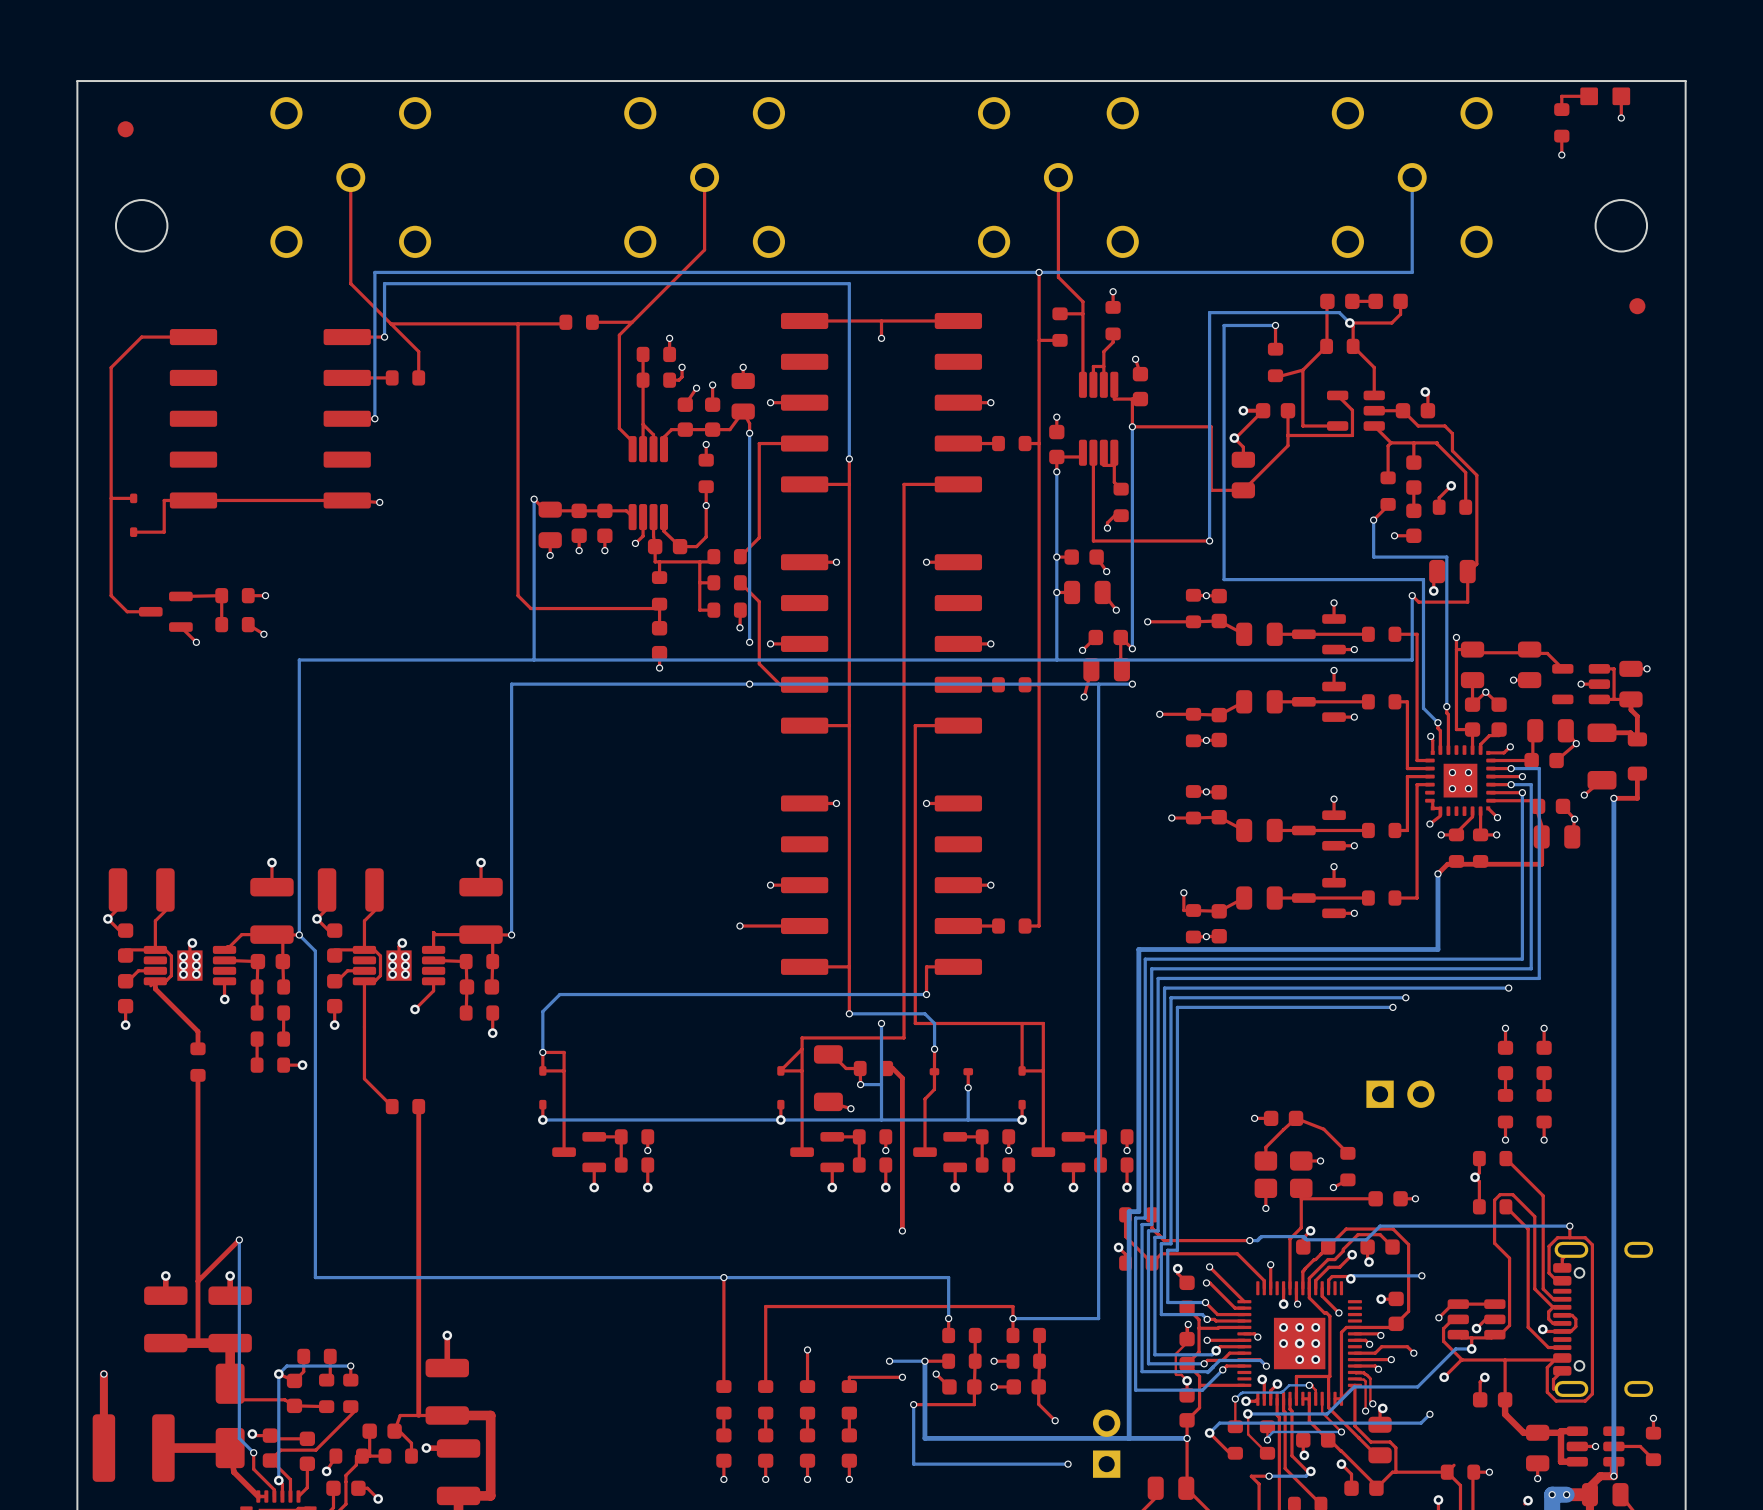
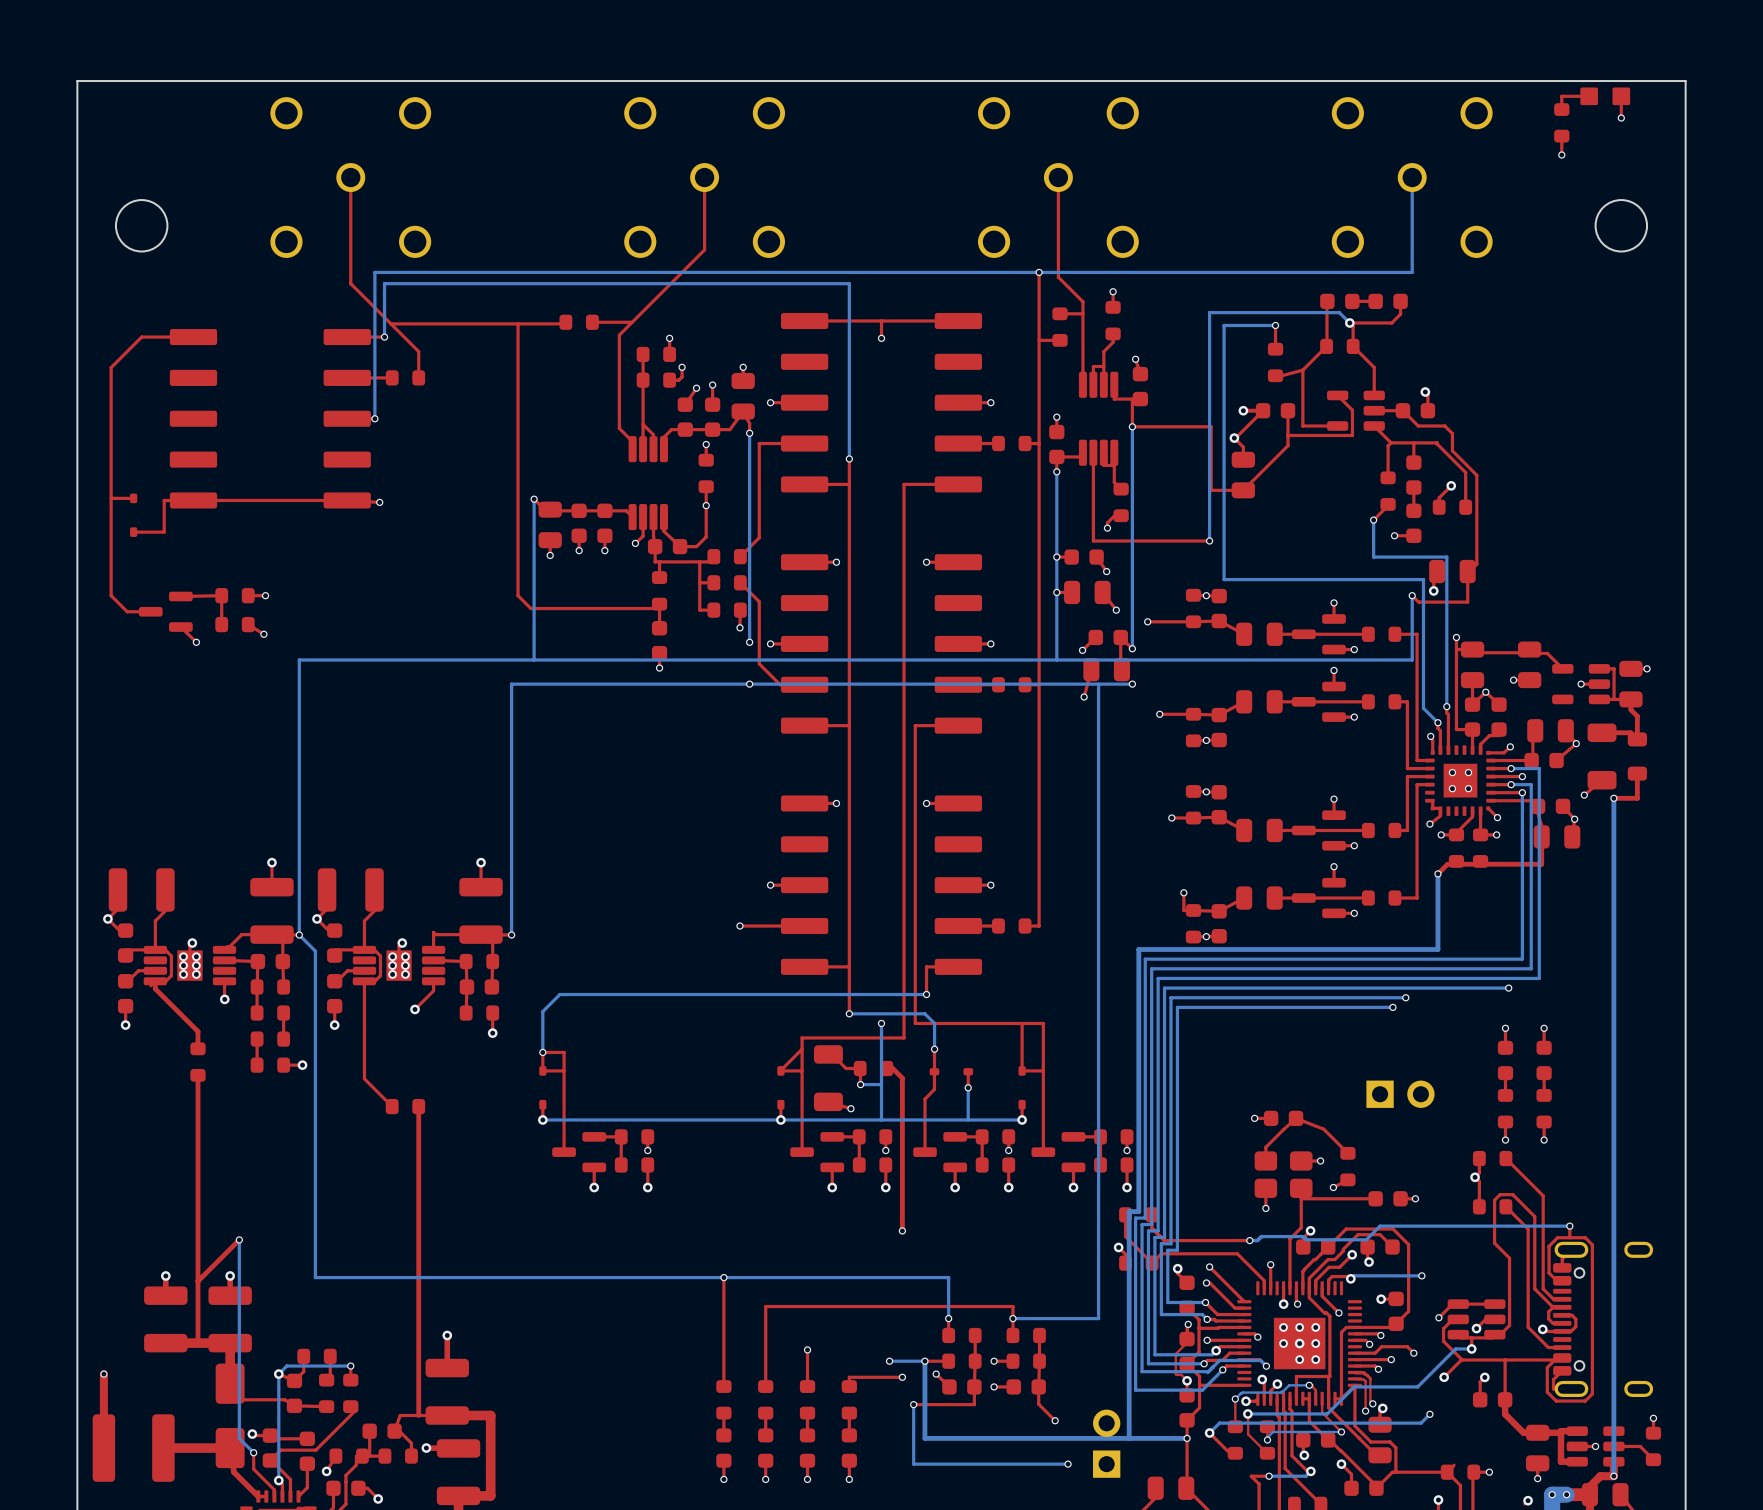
part: (125, 129) -> none
part: (1637, 306) -> none

